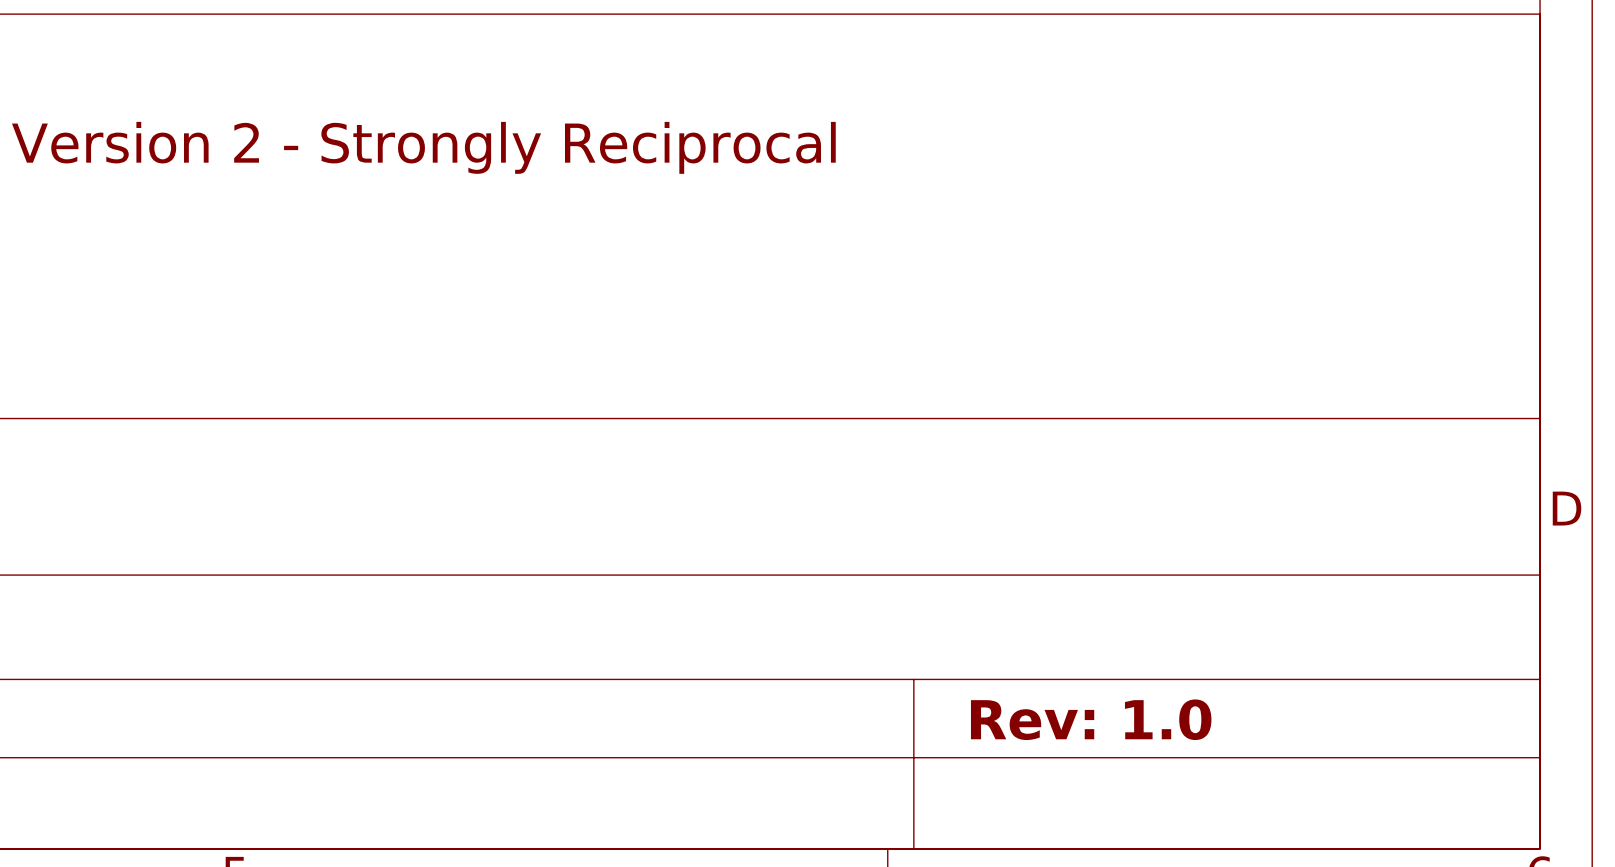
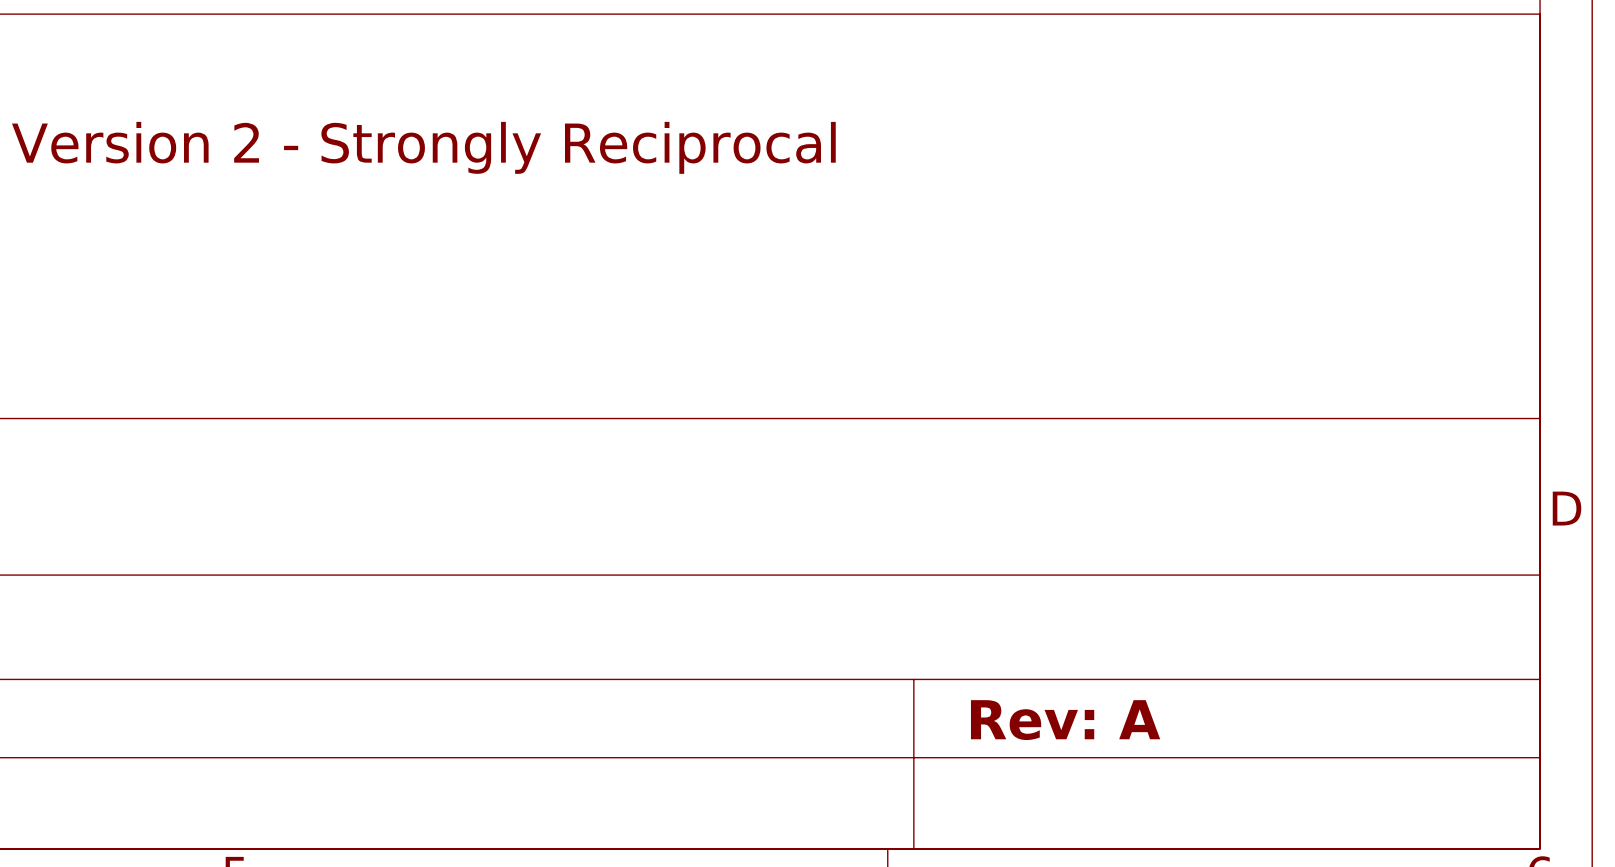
title block: Rev: 1.0 (1091, 719) -> Rev: A (1065, 720)

